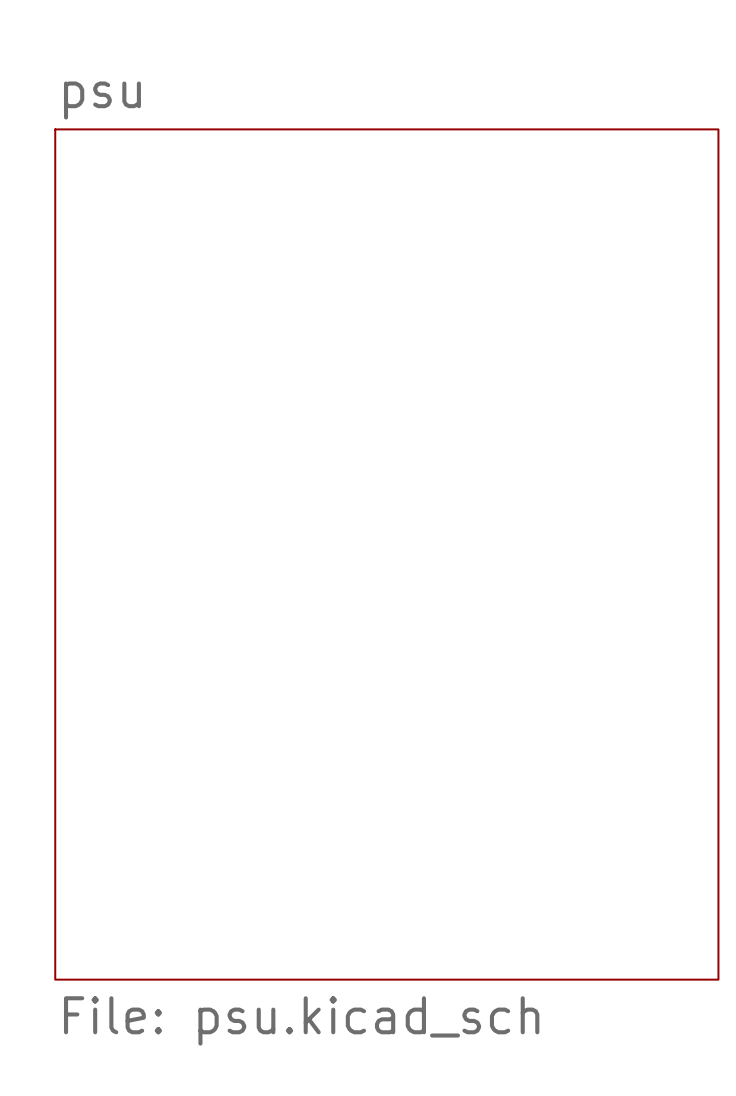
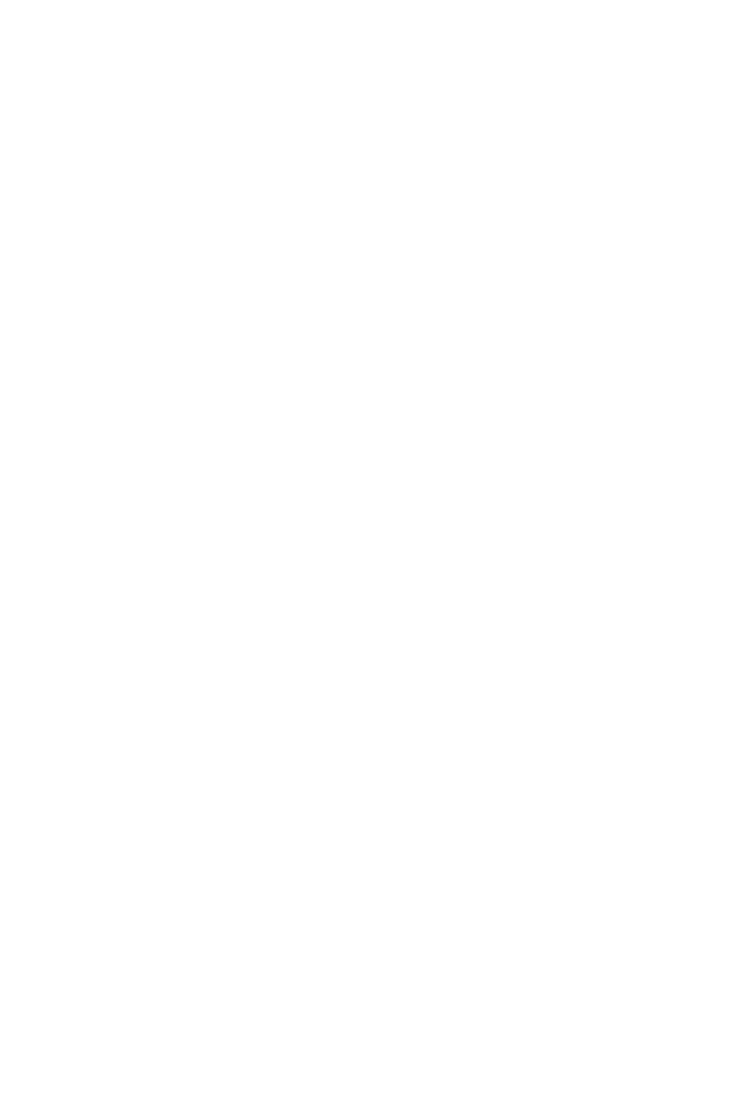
sheet psu: File: psu.kicad_sch (386, 554) -> none

